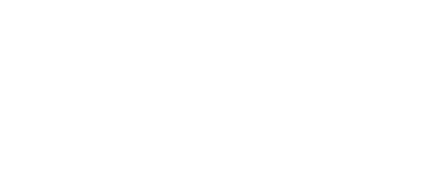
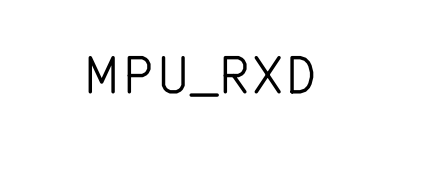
label: none -> MPU_RXD (200, 76)

